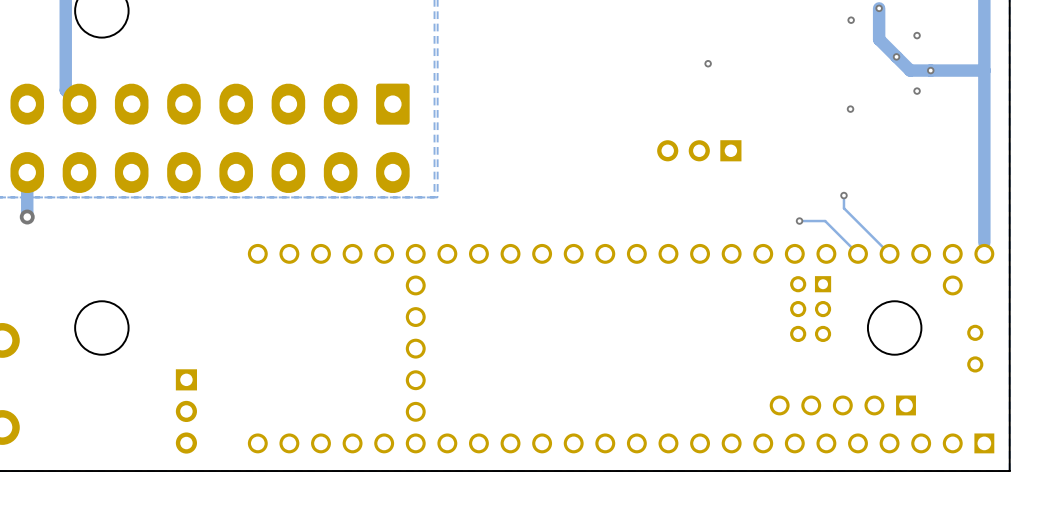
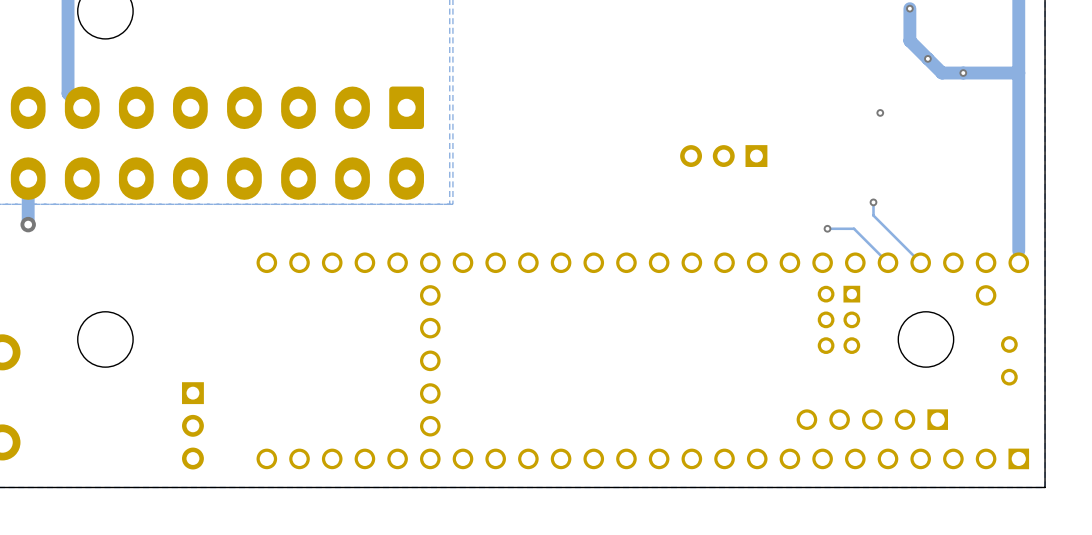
via: (851, 20) -> none
via: (917, 35) -> none
via: (708, 63) -> none
via: (917, 91) -> none

